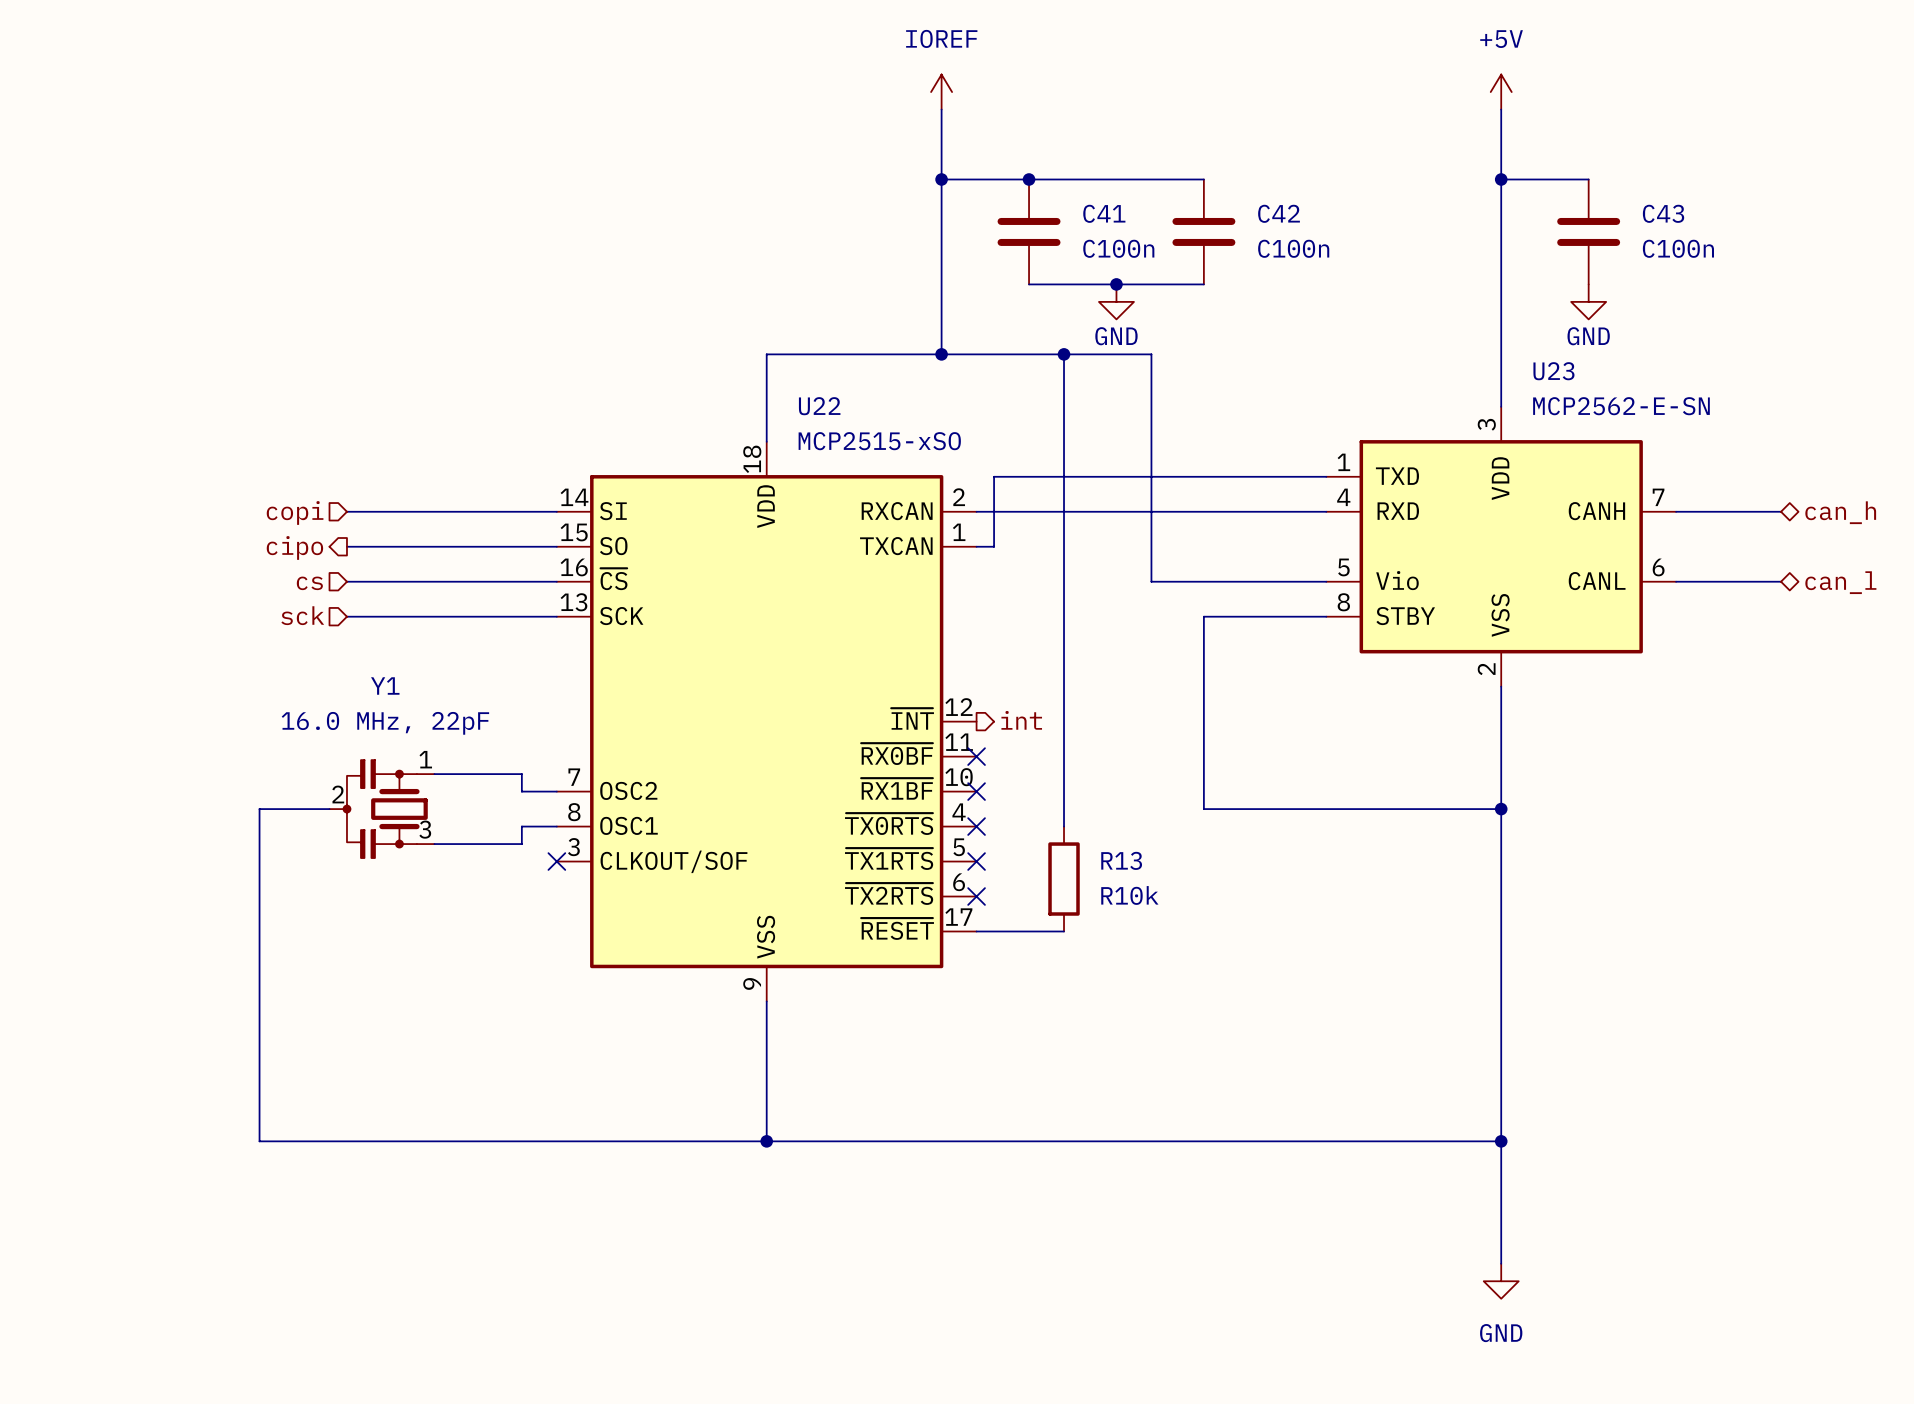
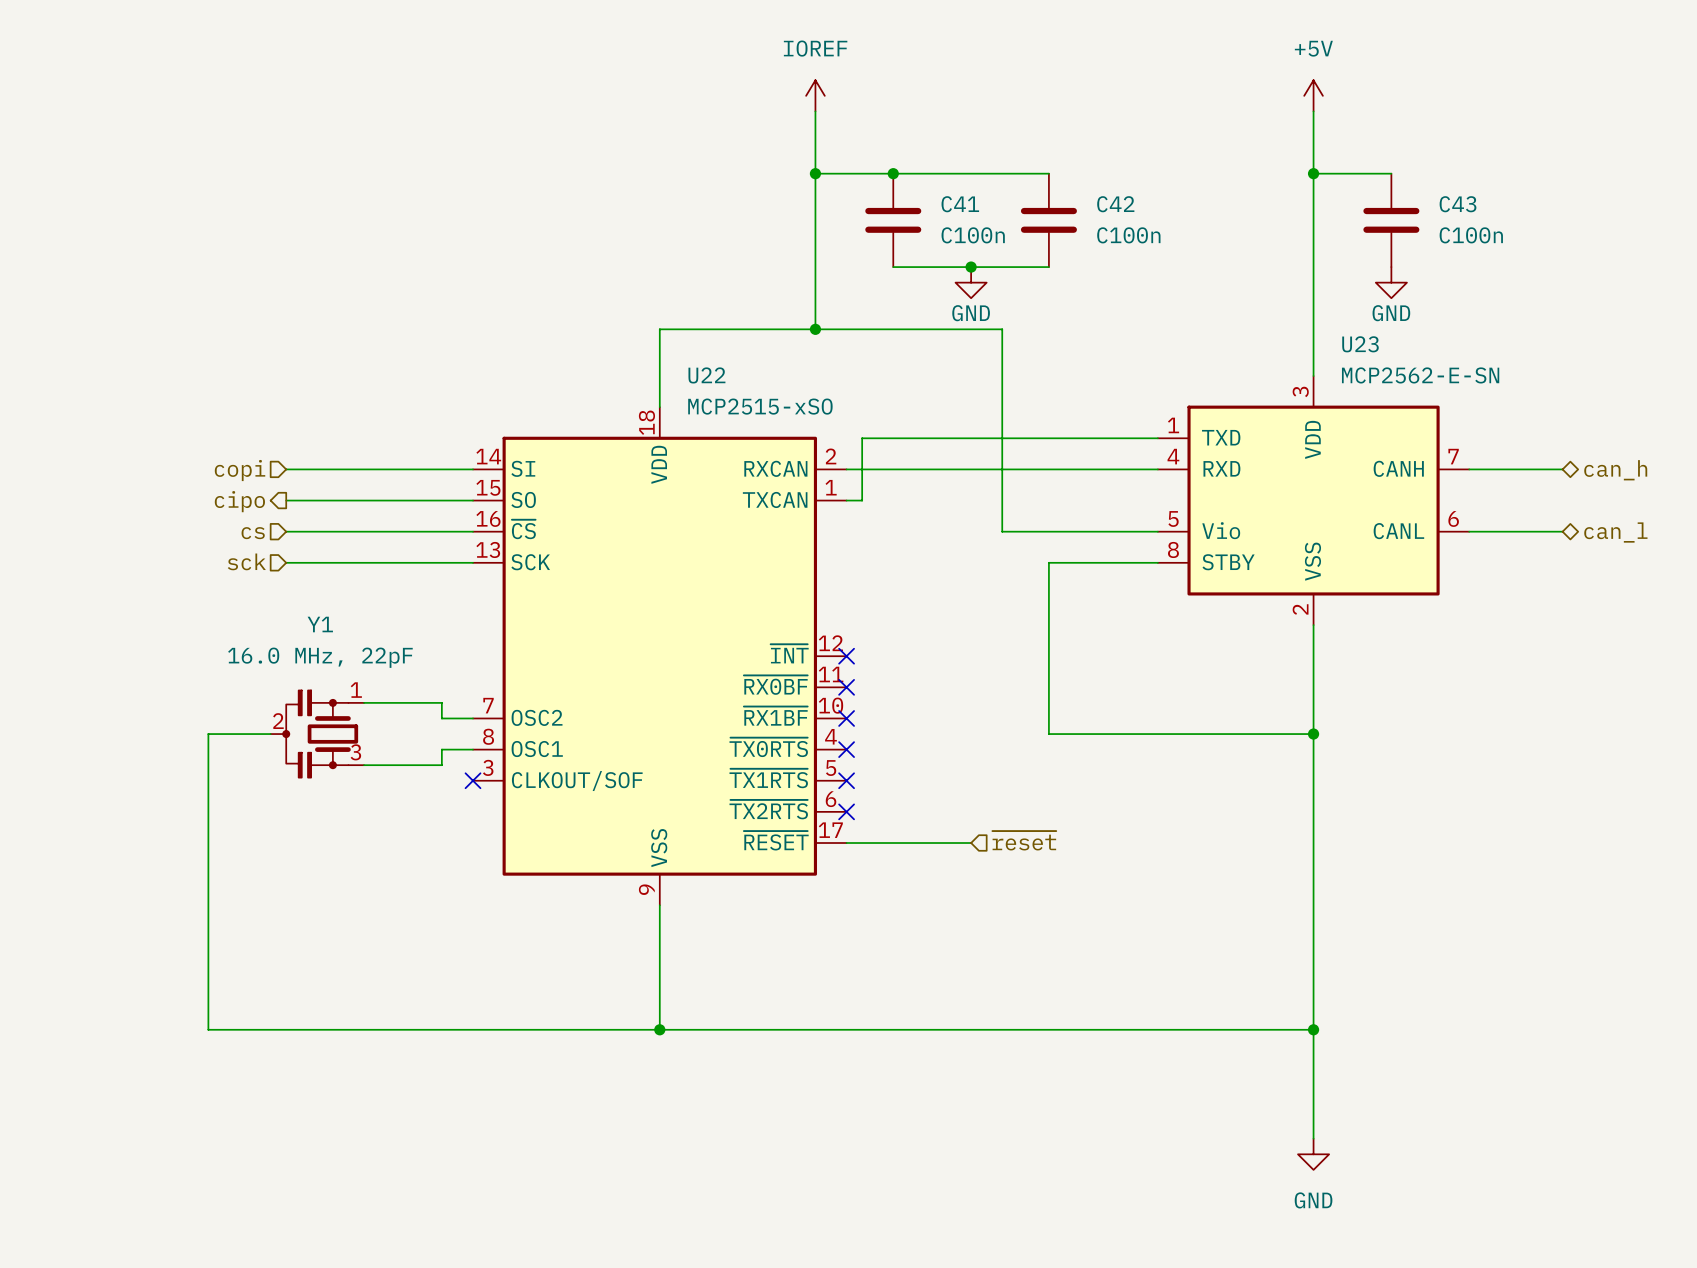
wire: (1064, 354) (1064, 826) -> none
junction: (1064, 354) -> none
hierarchical label: int (1021, 720) -> none
no-connect mark: none -> (846, 656)
R13: R10k (1064, 879) -> none
hierarchical label: none -> ~{reset} (1024, 840)
wire: none -> (924, 843) (971, 843)

